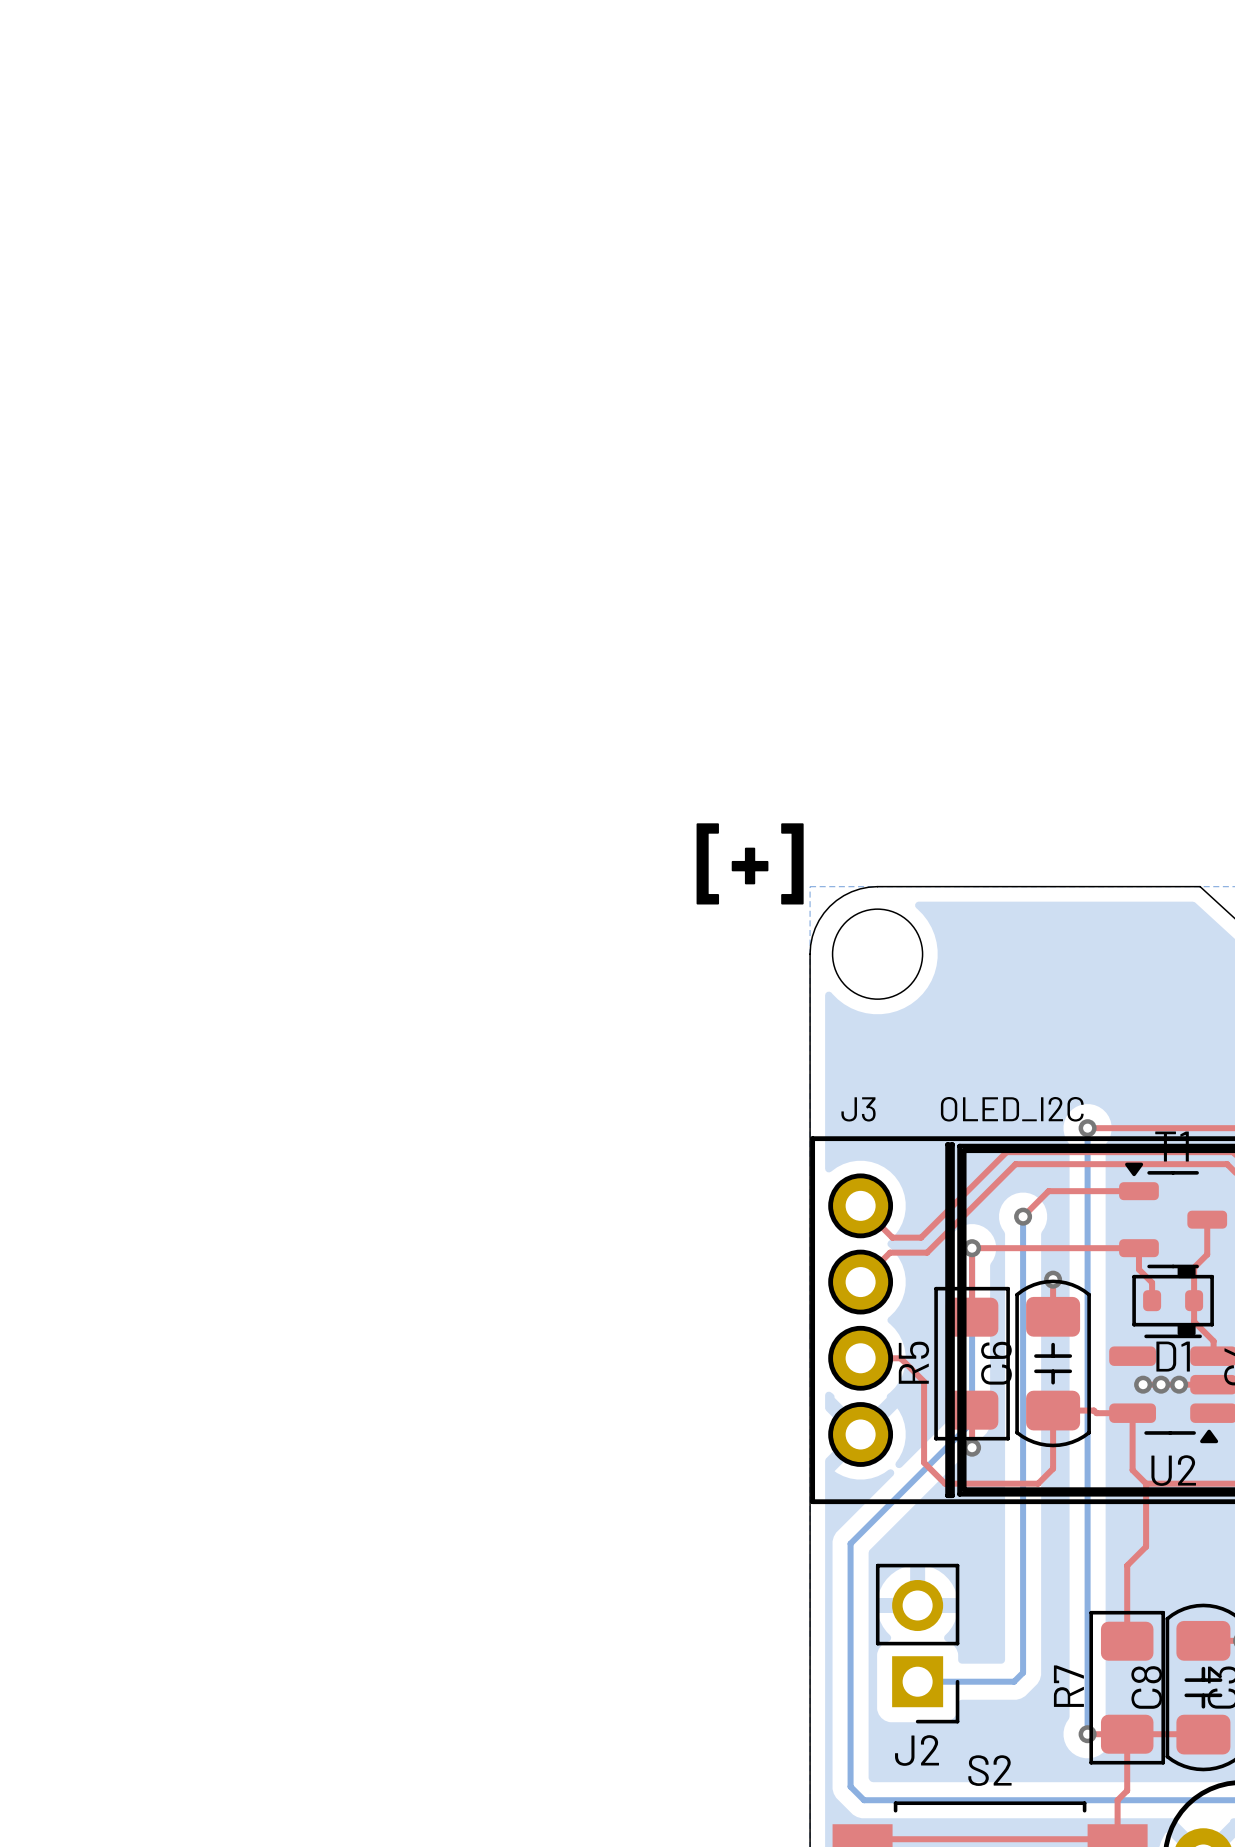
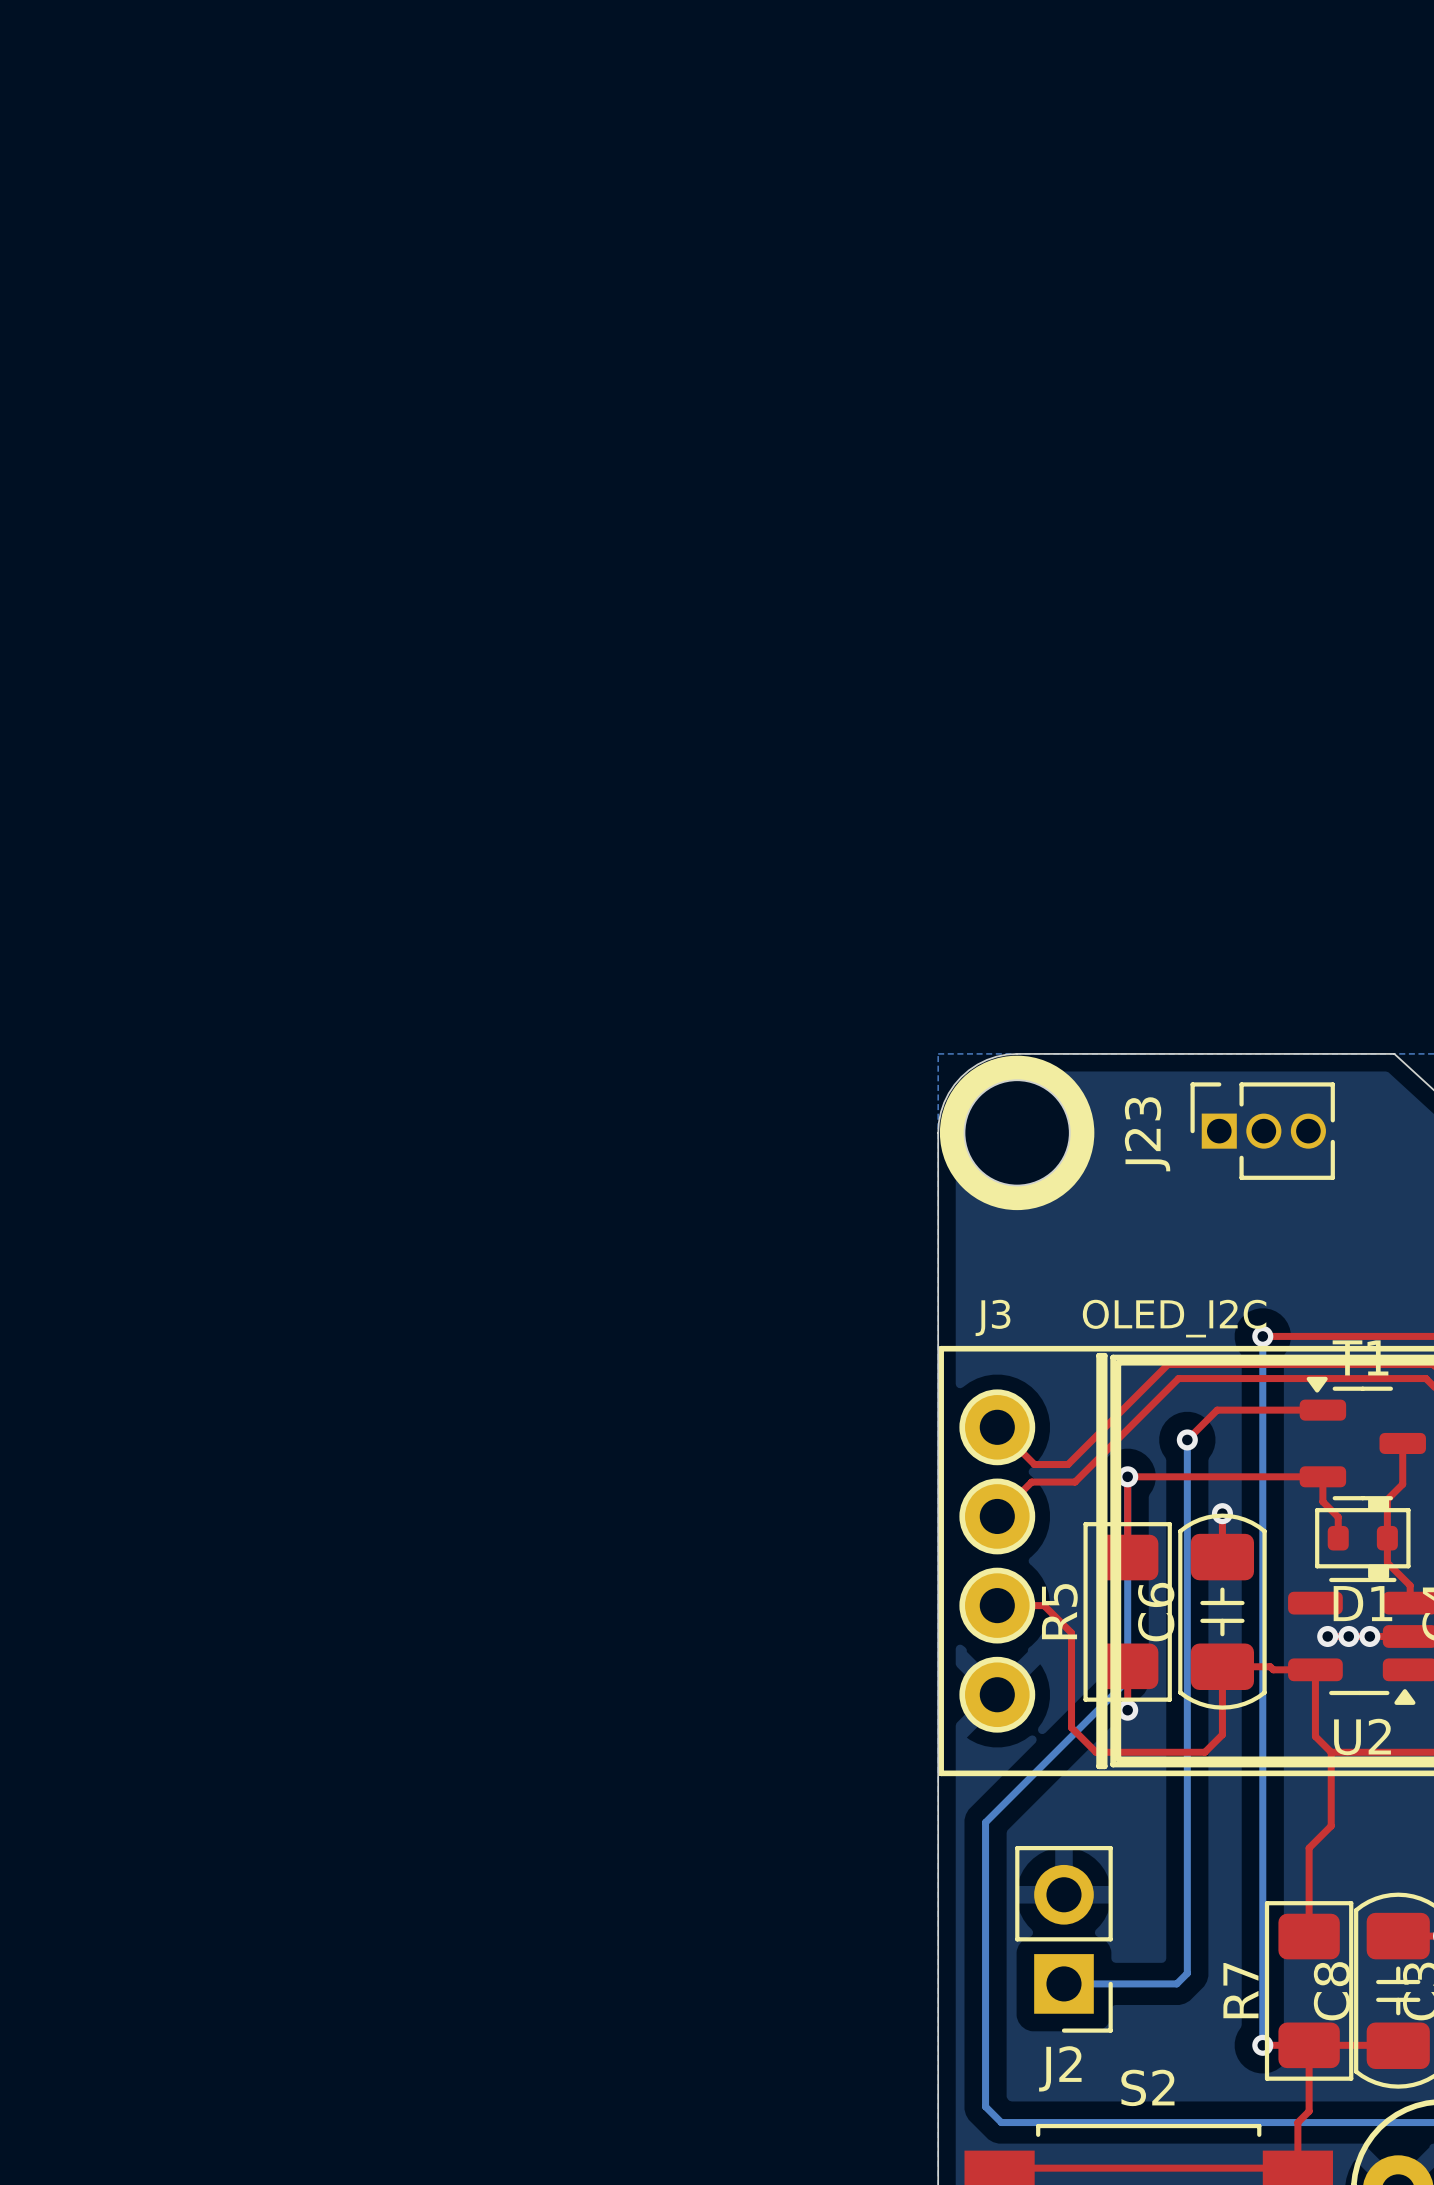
text: [+] (750, 863) -> none
drawing: none -> [939, 1055, 1095, 1211]
J23: none -> (1262, 1131)

